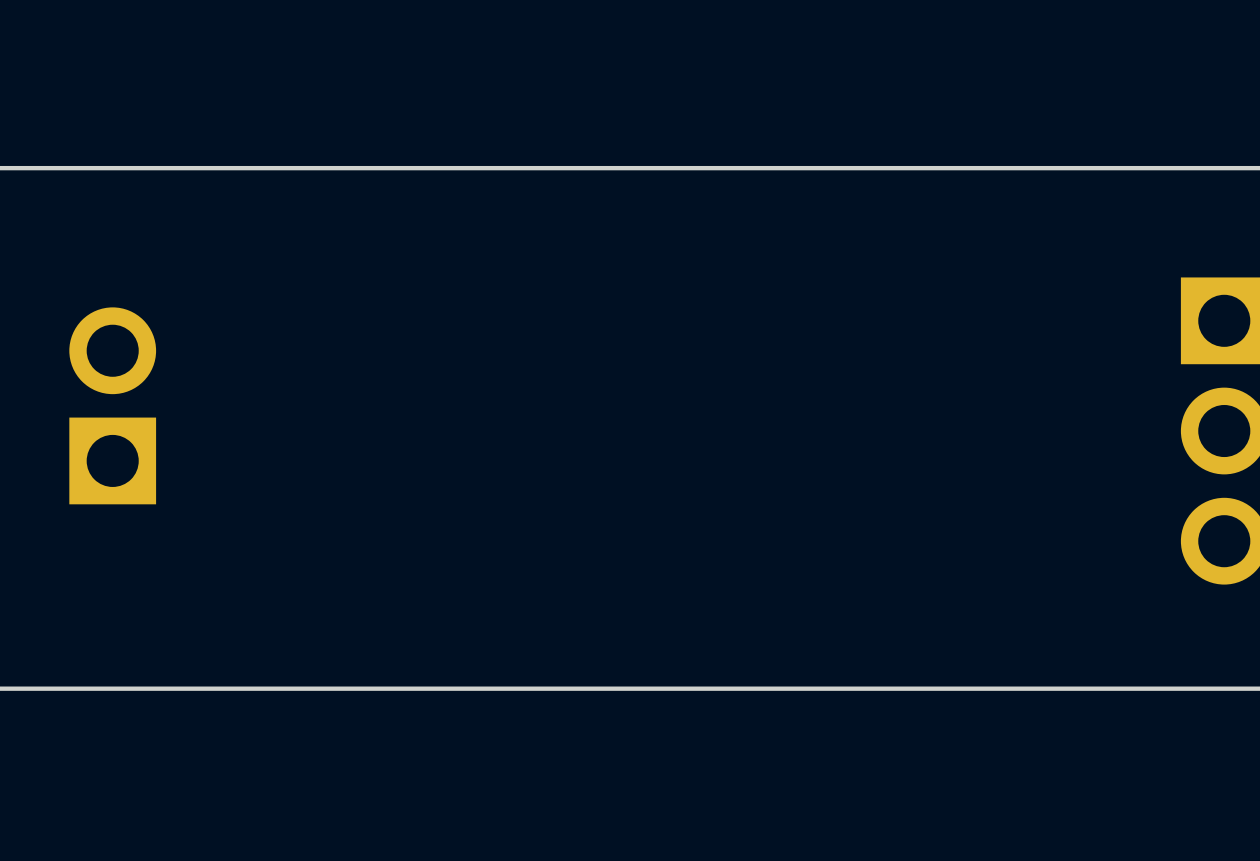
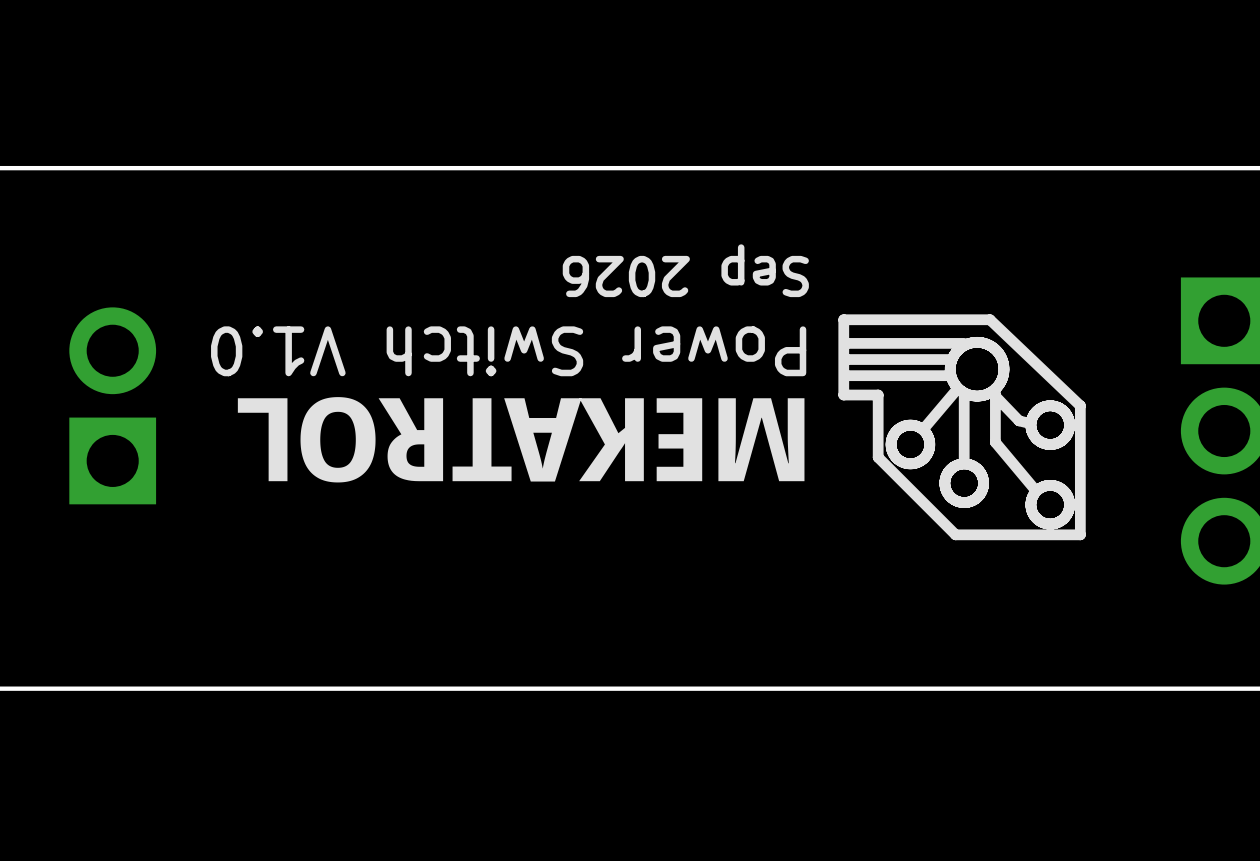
text: none -> Sep 2026 (685, 270)
line: none -> (990, 319) (1080, 405) (1080, 534) (955, 534) (878, 457) (878, 395) (843, 395) (843, 319) (990, 319)
line: none -> (981, 342) (991, 346) (998, 353) (1003, 362) (1003, 373) (1000, 383) (993, 390) (983, 395) (973, 395) (963, 392) (955, 385) (951, 375) (950, 365) (954, 355) (961, 347) (970, 343) (981, 342)
line: none -> (964, 343) (845, 343)
text: none -> Power Switch V1.0 (508, 351)
line: none -> (950, 359) (845, 359)
line: none -> (950, 375) (845, 375)
line: none -> (957, 388) (922, 429)
line: none -> (995, 388) (995, 442) (1034, 488)
line: none -> (964, 392) (964, 463)
line: none -> (992, 392) (1019, 420) (1028, 423)
drawing: none -> [237, 397, 805, 483]
line: none -> (1053, 406) (1065, 413) (1068, 420) (1069, 428) (1061, 440) (1055, 443) (1047, 444) (1034, 436) (1031, 429) (1031, 422) (1038, 409) (1045, 406) (1053, 406)
line: none -> (922, 429) (916, 426) (908, 425) (895, 432) (891, 438) (891, 446) (898, 459) (904, 462) (912, 463) (925, 456) (928, 450) (929, 442) (922, 429)
line: none -> (964, 463) (977, 469) (983, 483) (977, 496) (964, 502) (950, 496) (944, 483) (950, 469) (964, 463)
line: none -> (1051, 485) (1064, 491) (1069, 505) (1063, 519) (1049, 524) (1035, 517) (1030, 503) (1037, 490) (1051, 485)

